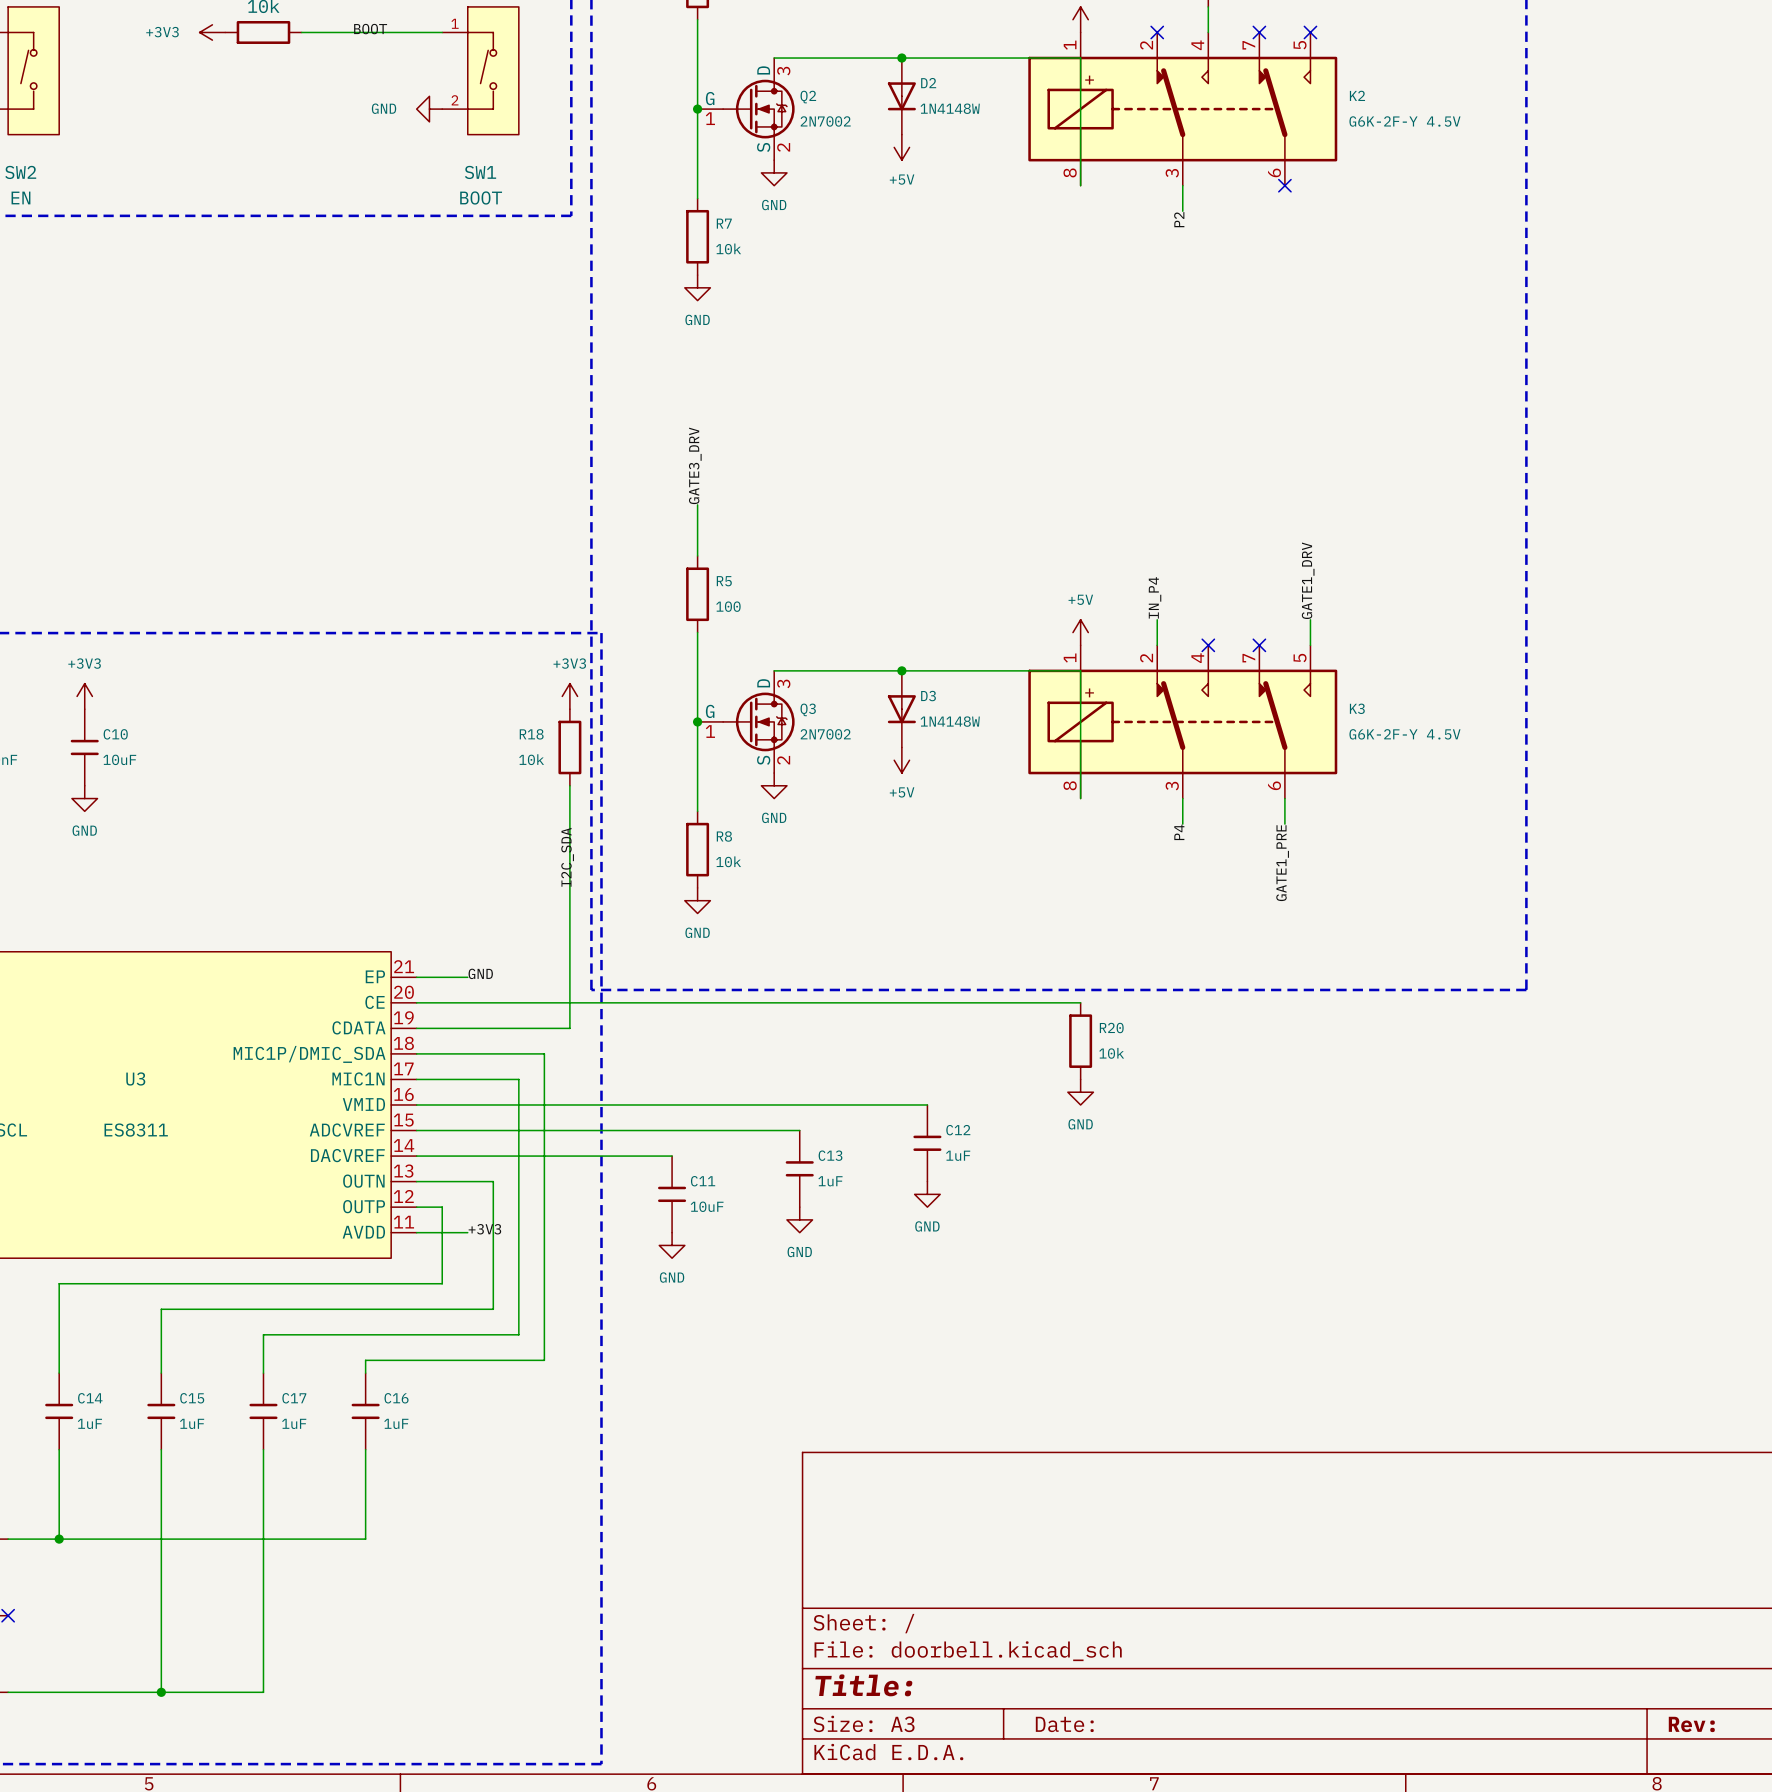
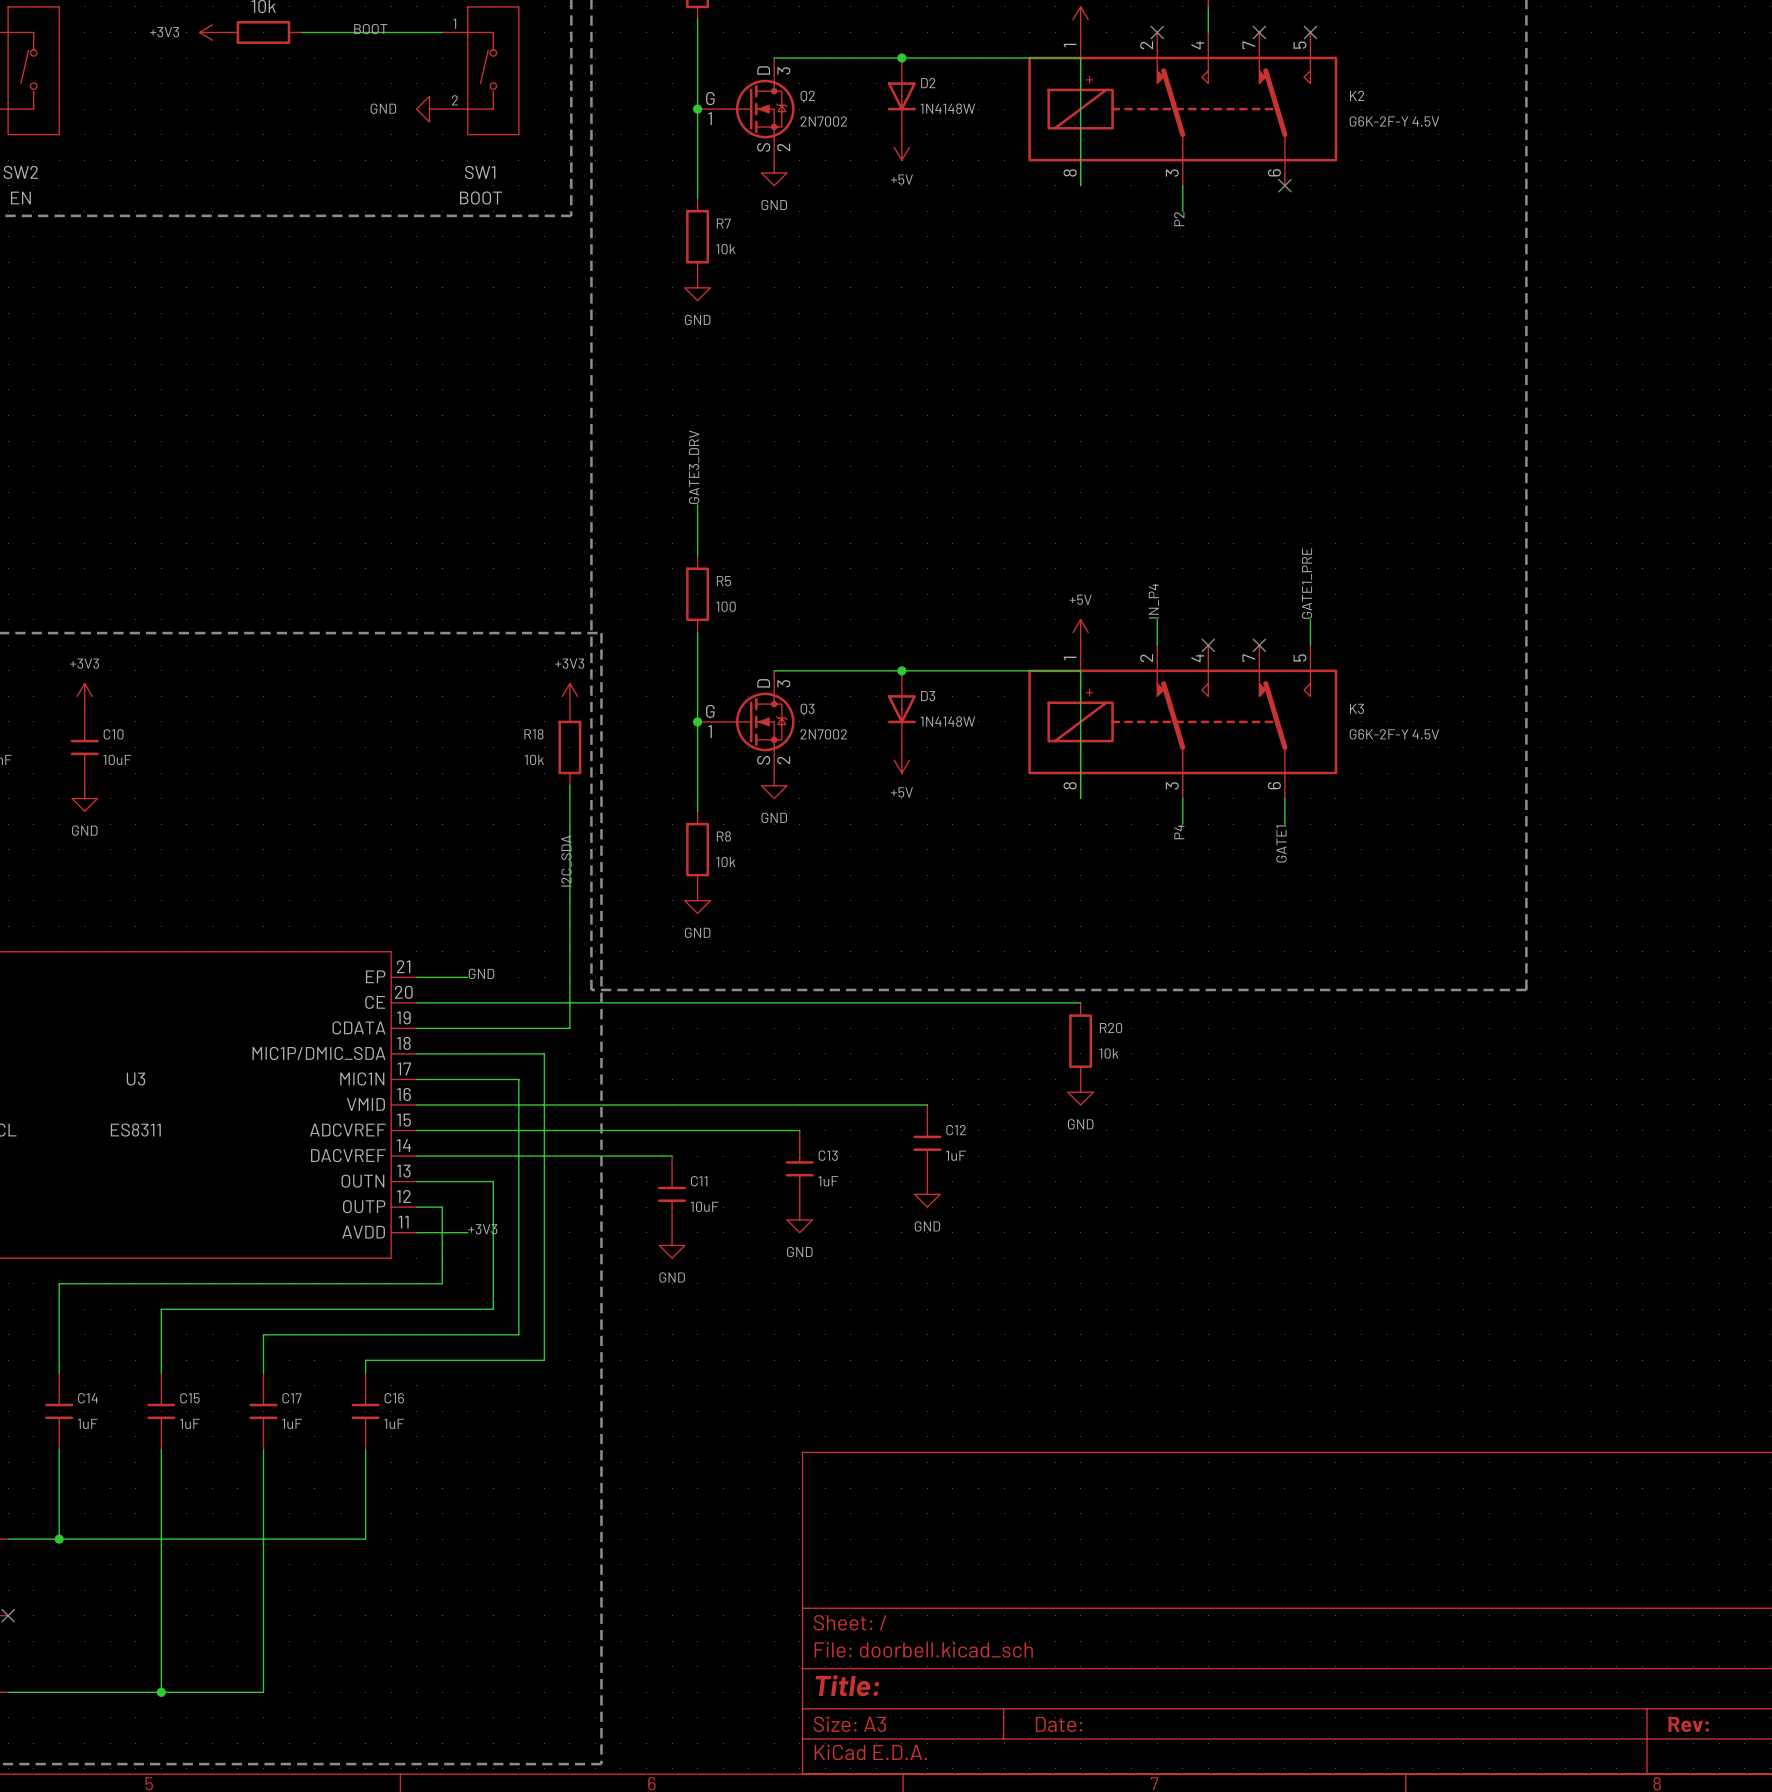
label: GATE1_DRV (1308, 580) -> GATE1_PRE (1307, 583)
label: GATE1_PRE (1282, 863) -> GATE1 (1281, 843)

